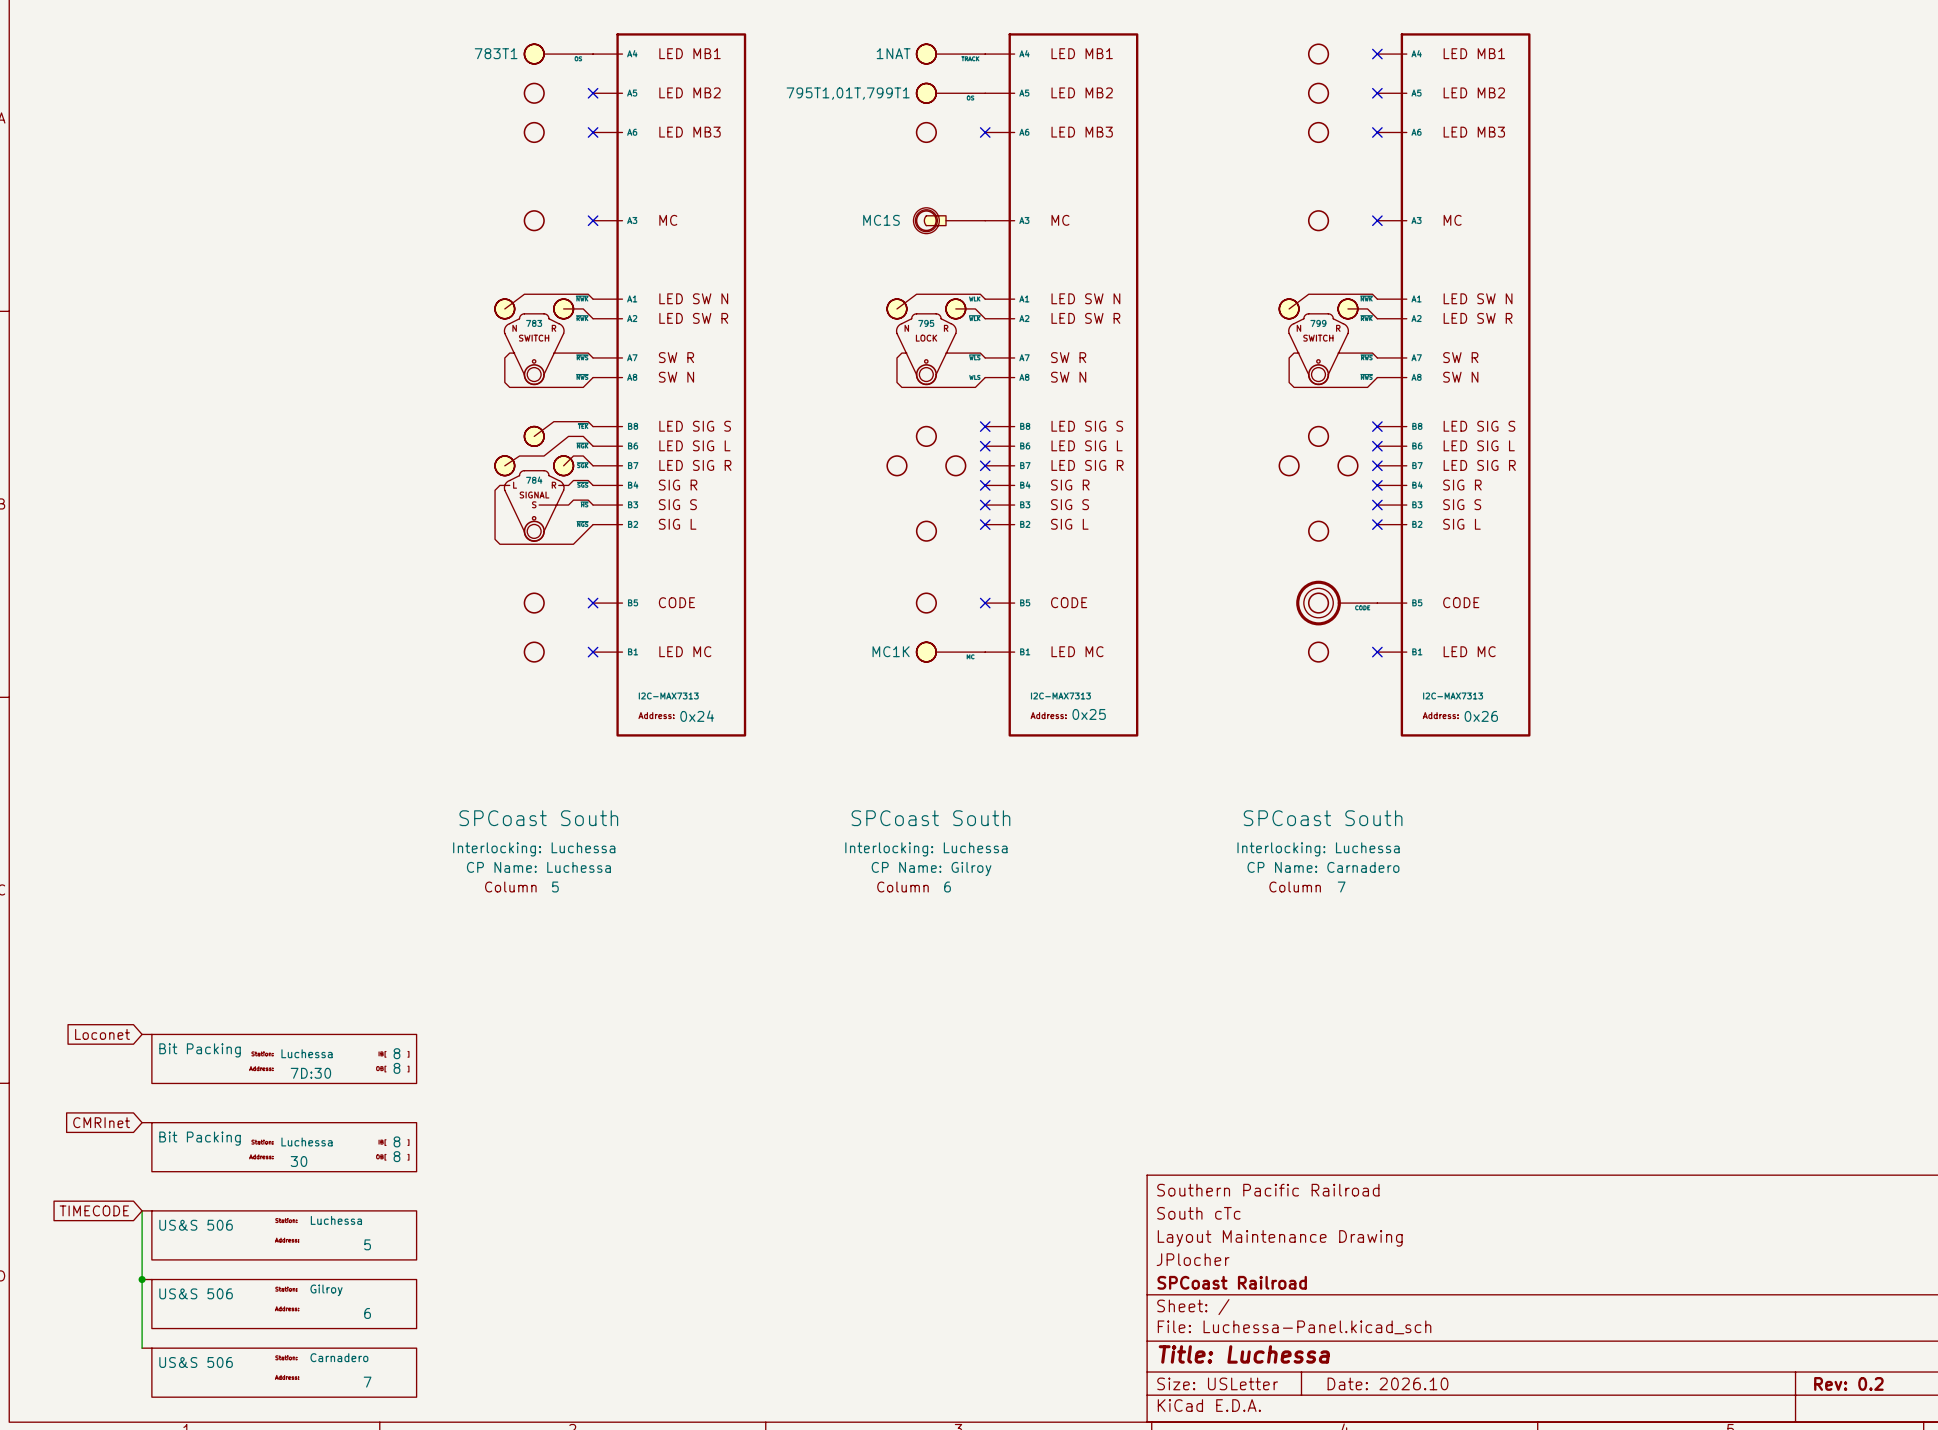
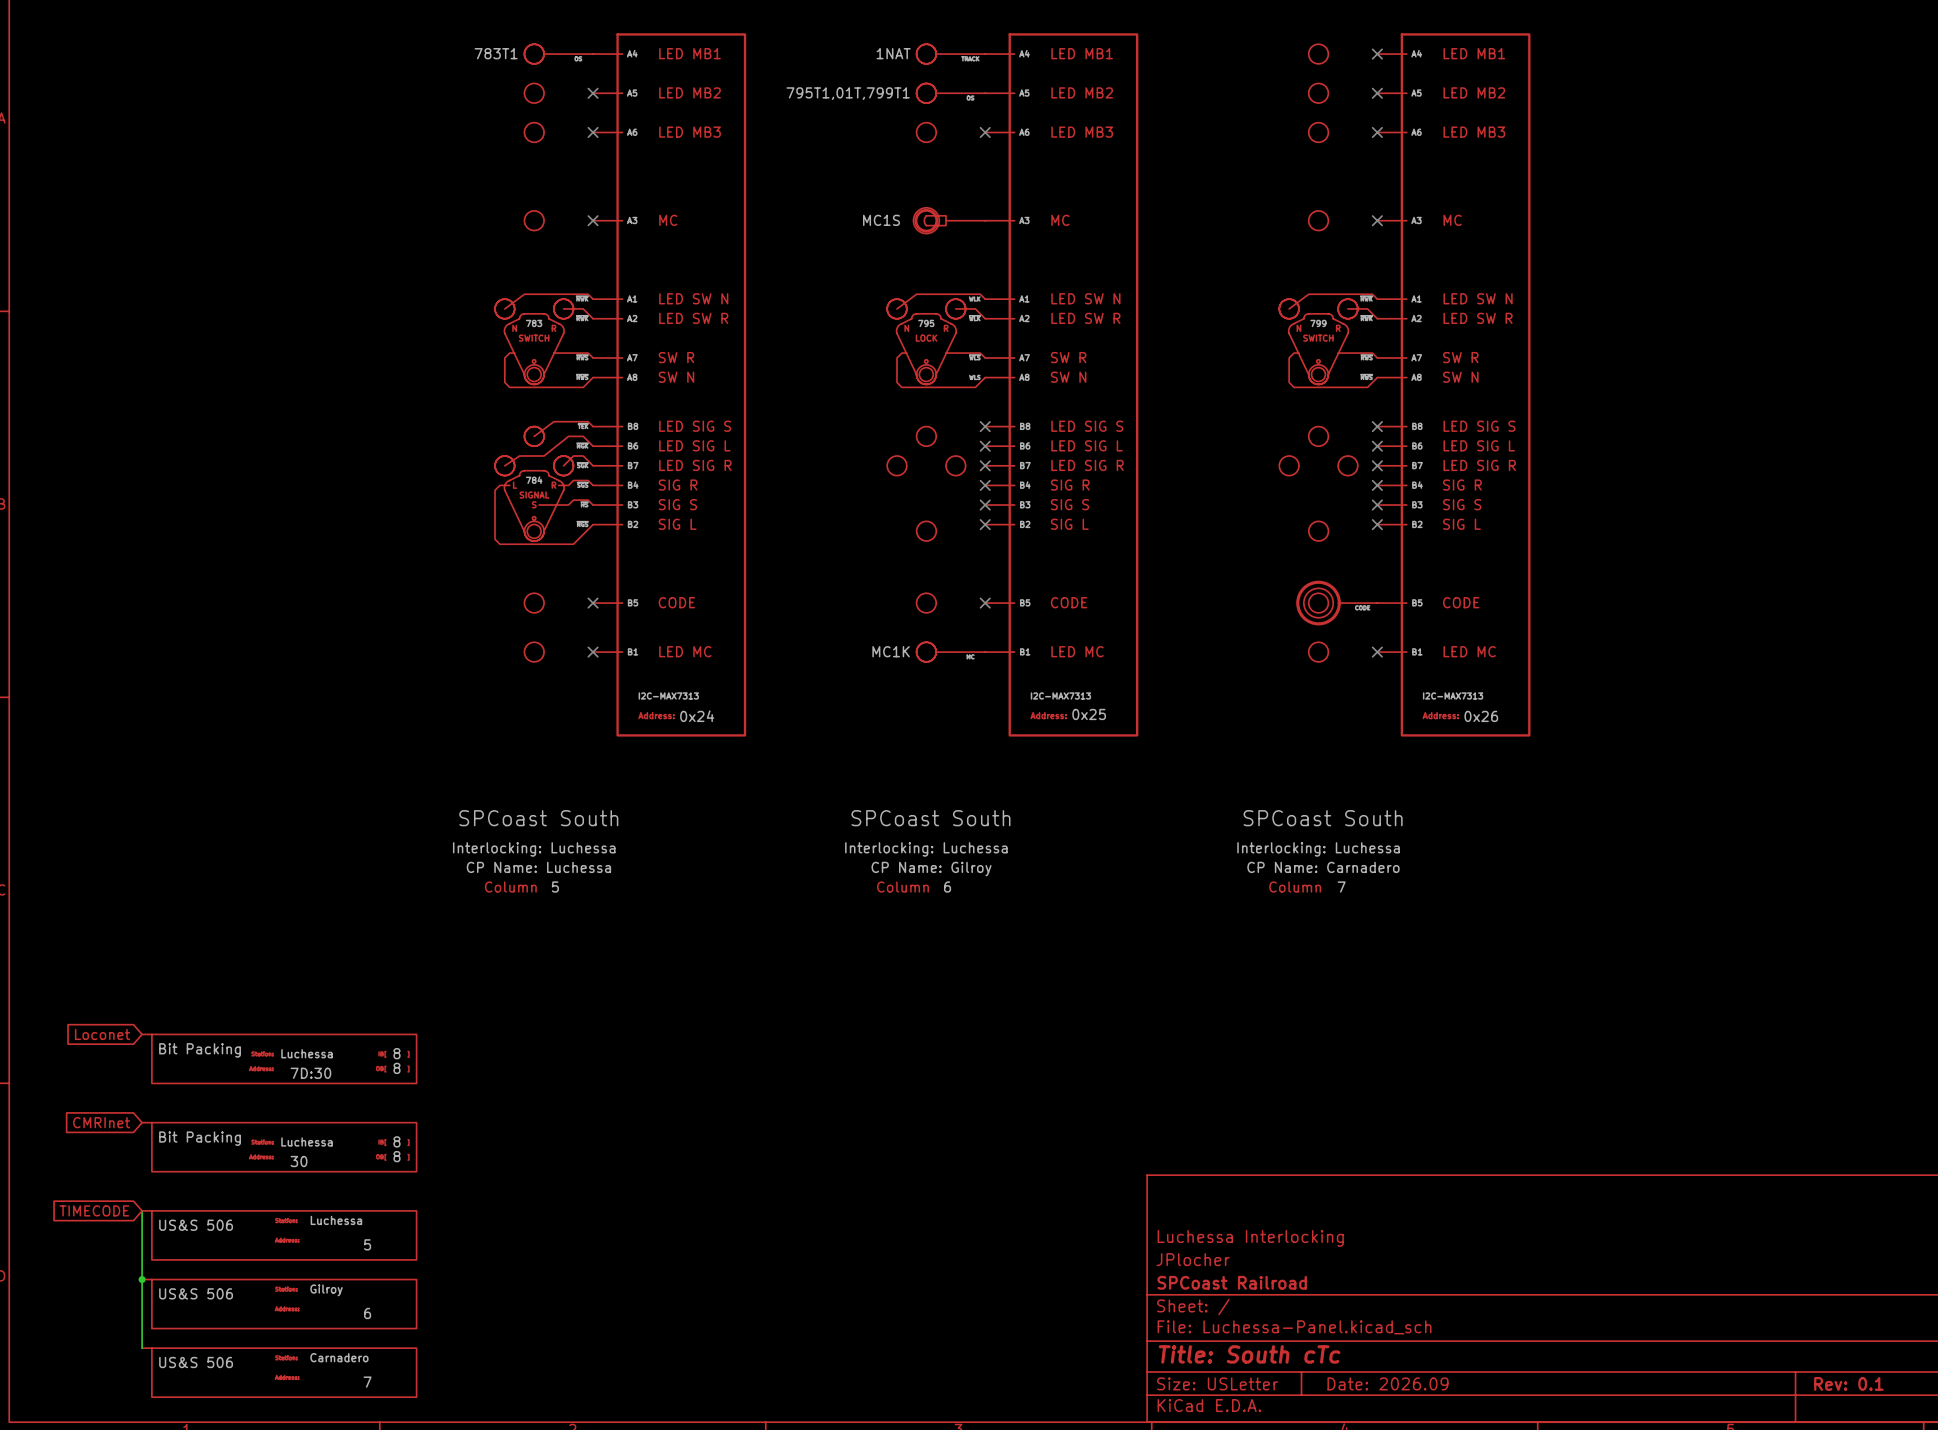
title block: Southern Pacific Railroad (1268, 1190) -> none
title block: South cTc (1198, 1213) -> none
title block: Layout Maintenance Drawing (1280, 1238) -> Luchessa Interlocking (1250, 1238)
title block: Title: Luchessa (1244, 1354) -> Title: South cTc (1249, 1354)
title block: Date: 2026.10 (1388, 1383) -> Date: 2026.09 (1388, 1383)
title block: Rev: 0.2 (1848, 1383) -> Rev: 0.1 (1848, 1383)

